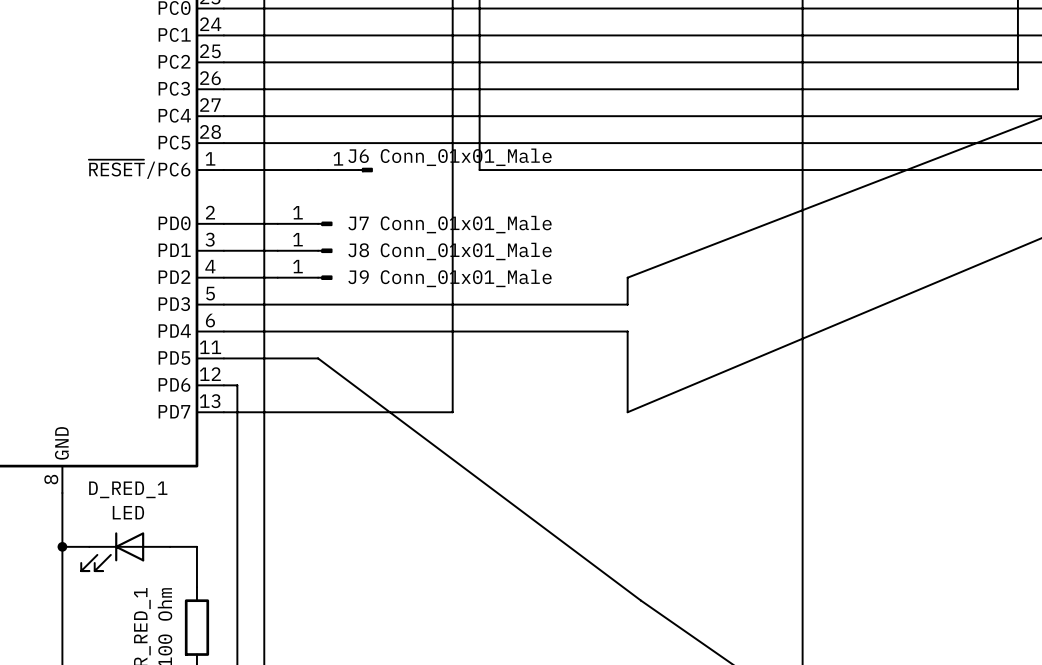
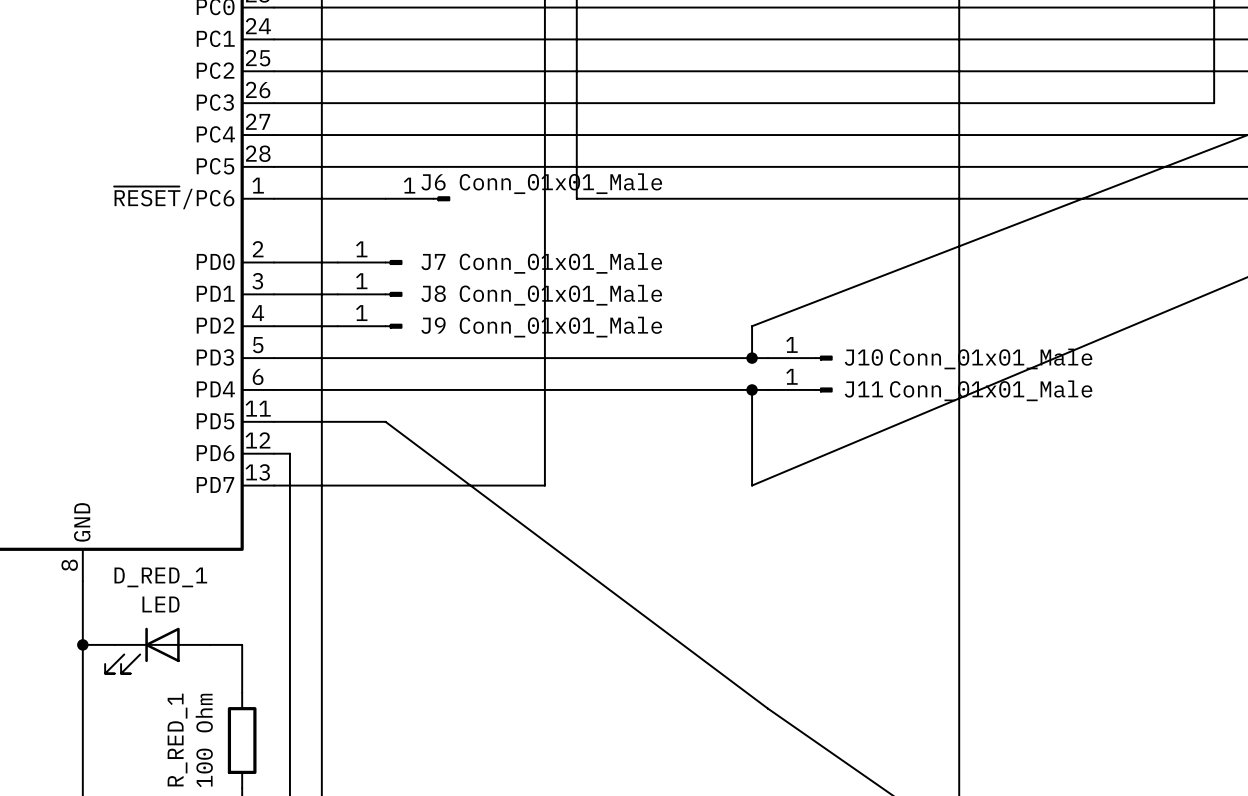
wire: none -> (752, 358) (768, 358)
junction: none -> (752, 358)
J10: none -> Conn_01x01_Male (800, 358)
wire: none -> (752, 389) (768, 389)
junction: none -> (752, 389)
J11: none -> Conn_01x01_Male (800, 389)

